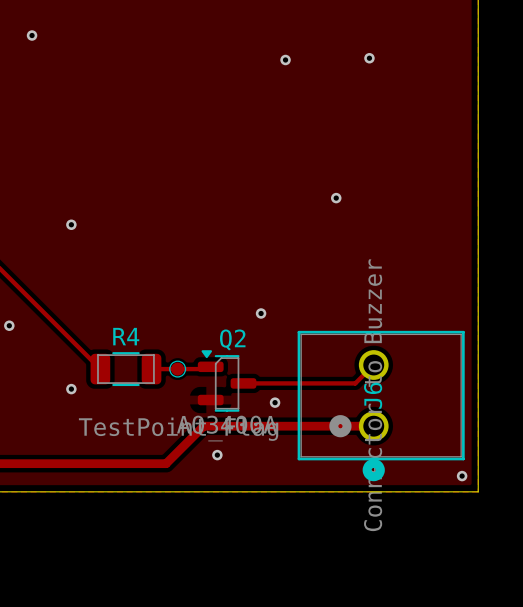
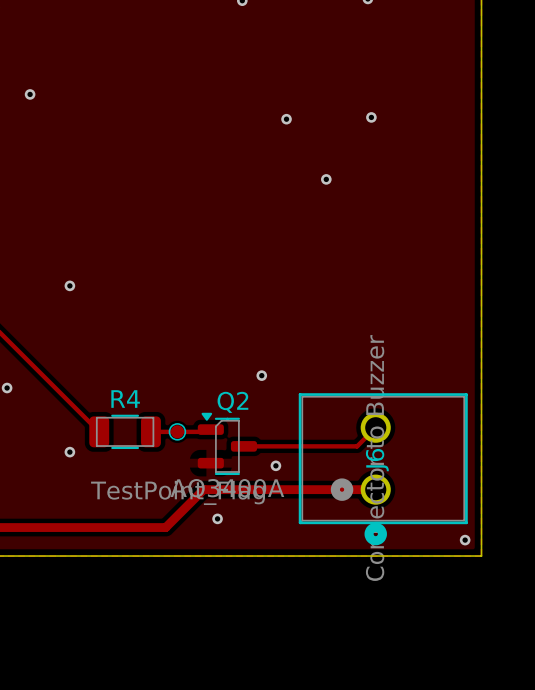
via position: (336, 198) -> (326, 179)

